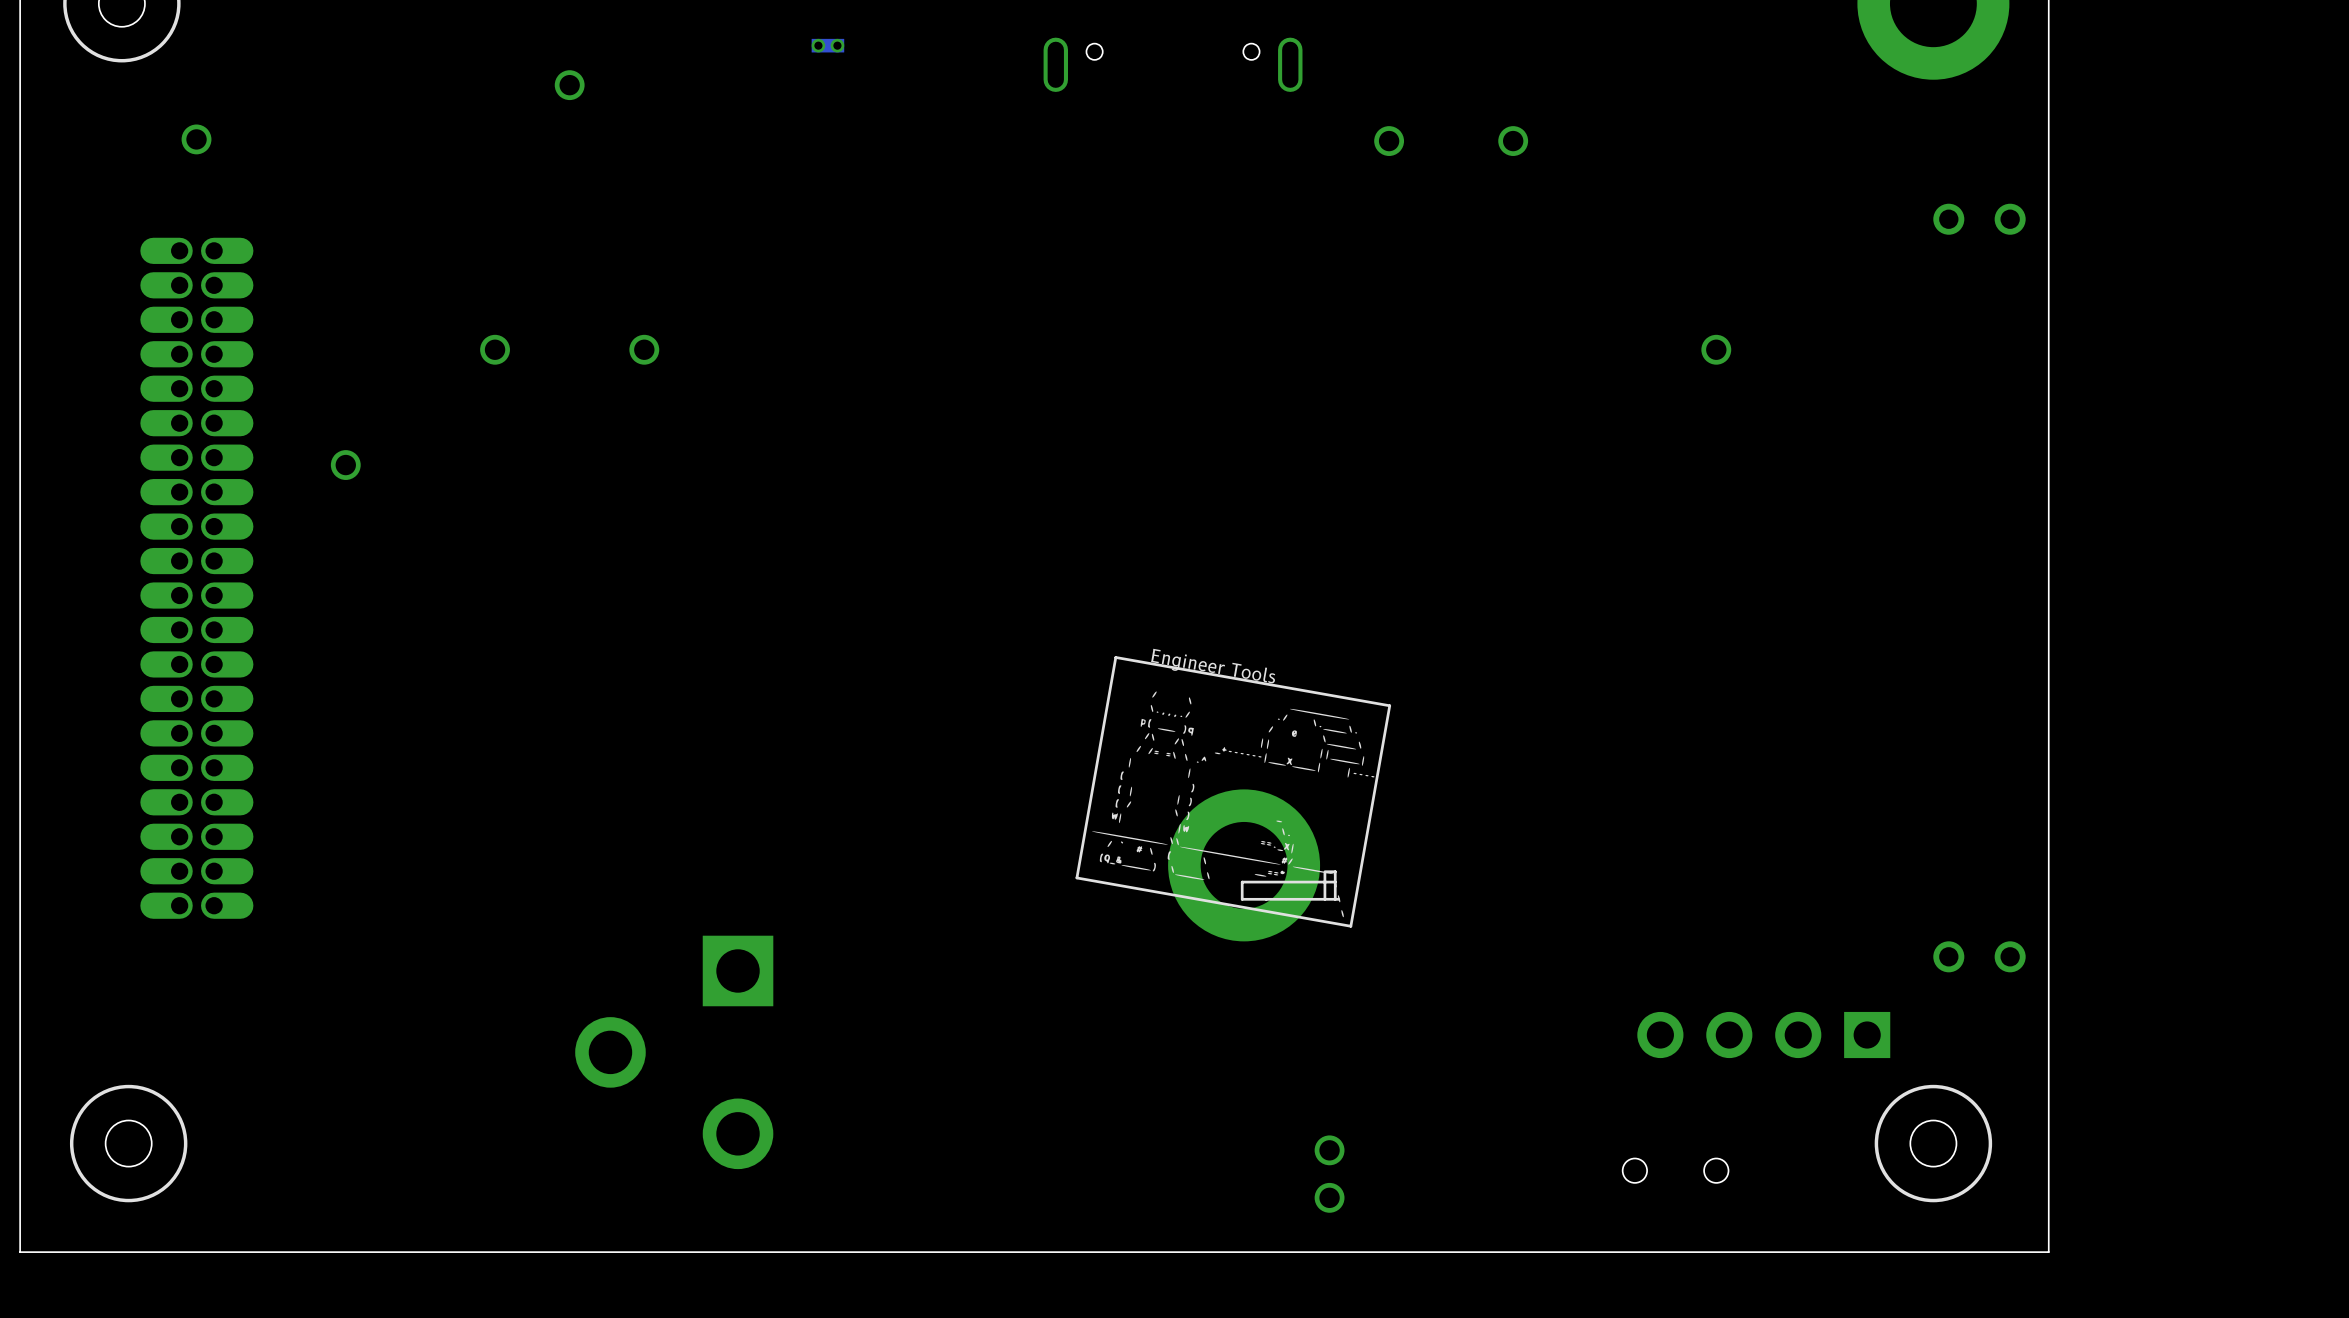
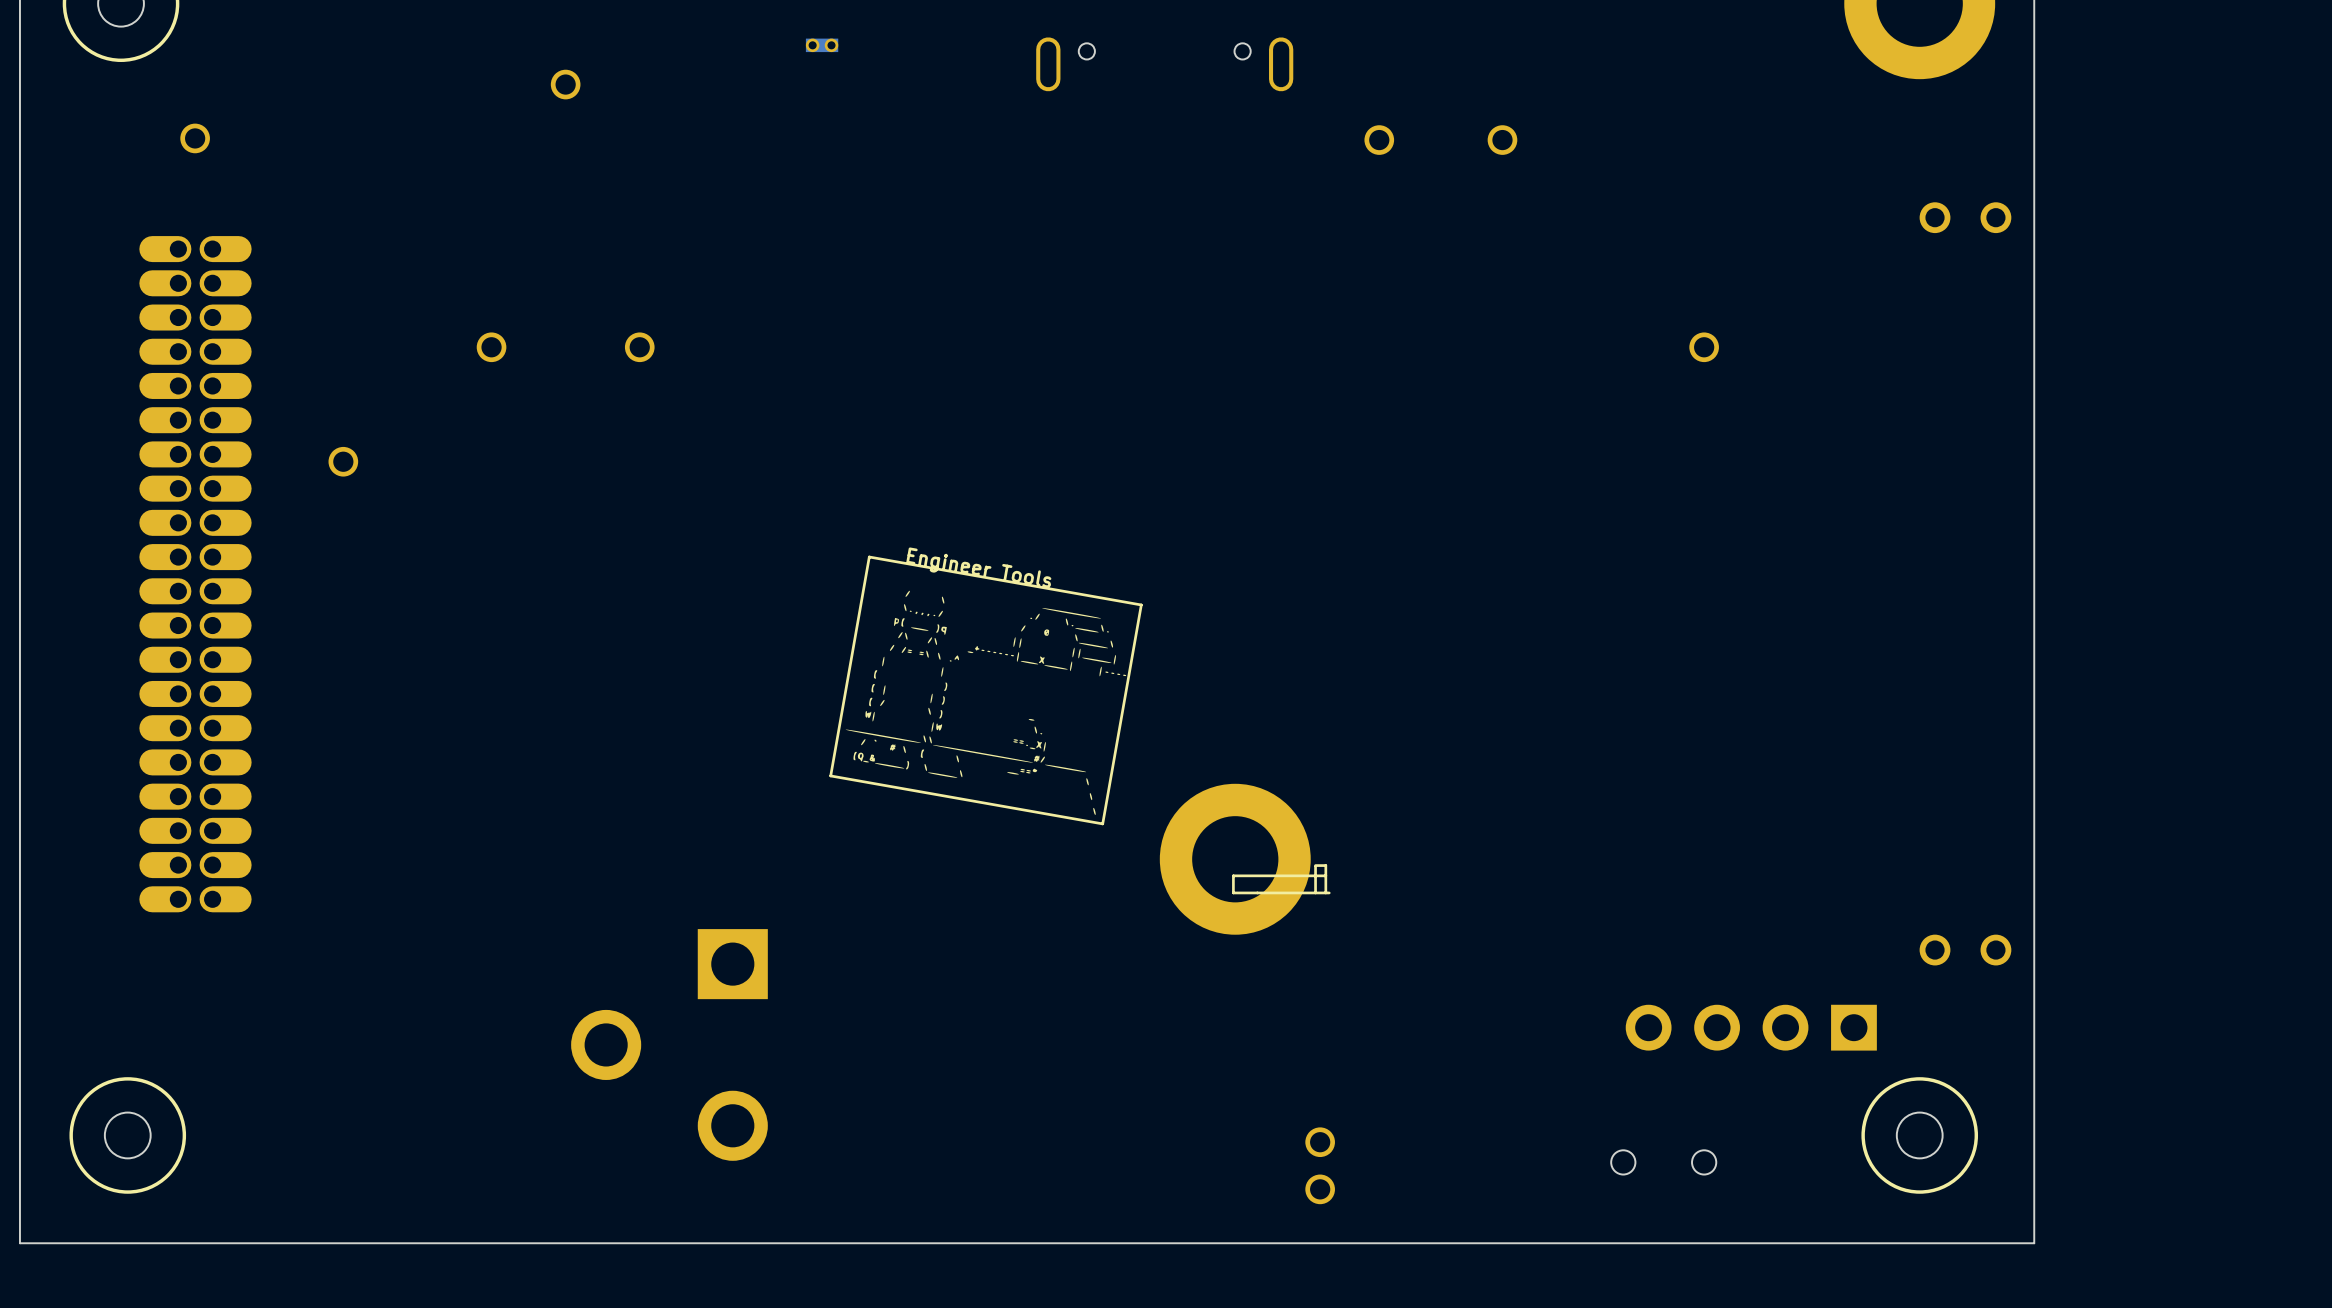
line: (1115, 657) (1389, 705) (1350, 926) (1076, 877) (1115, 657) -> (869, 557) (1141, 604) (1102, 823) (830, 775) (869, 557)
text position: Engineer Tools (1213, 666) -> Engineer Tools (978, 567)
drawing position: (1233, 804) -> (985, 702)

